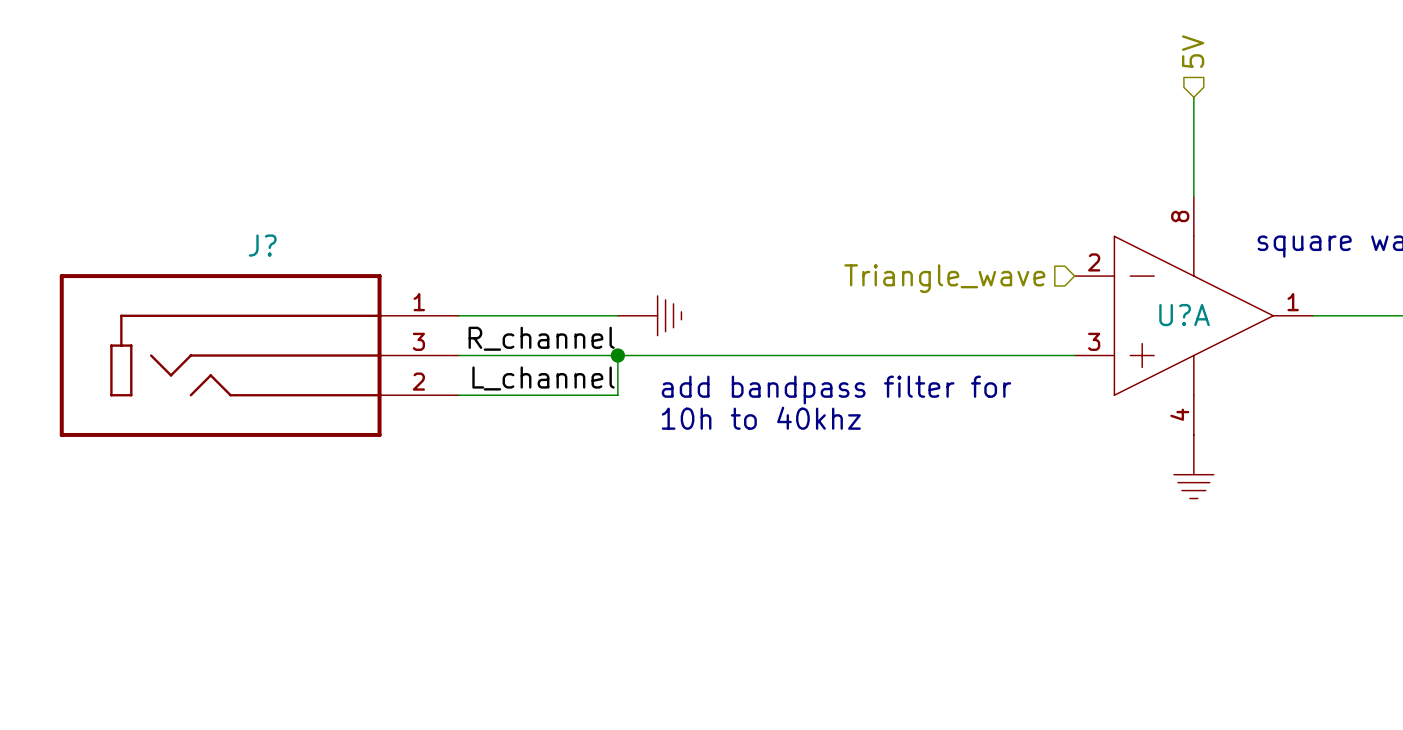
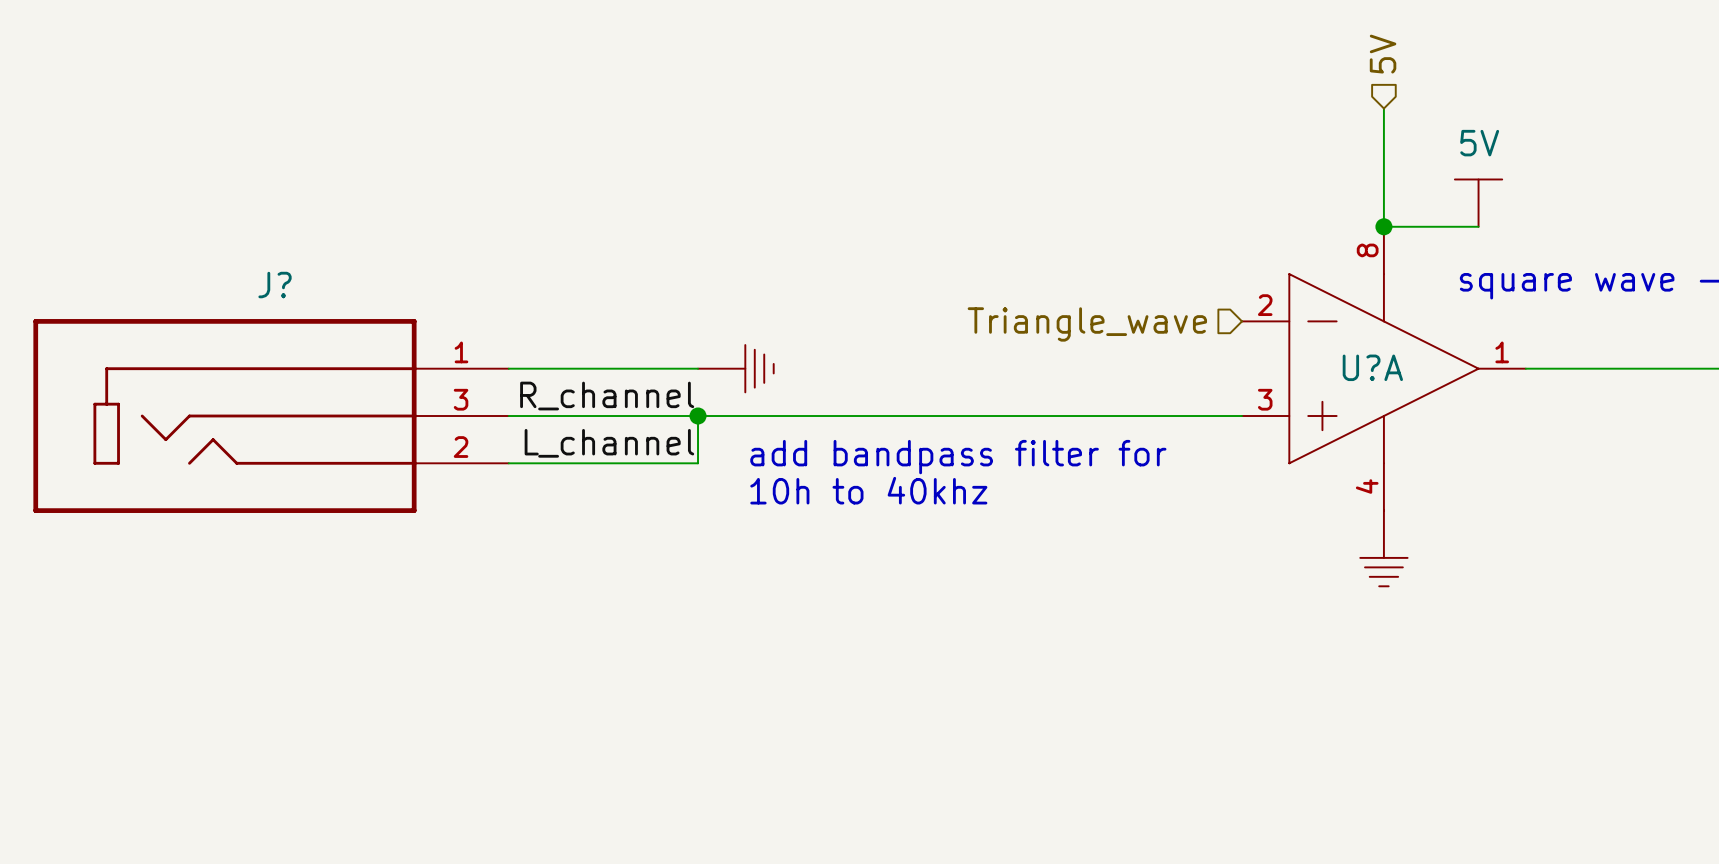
power symbol: none -> 5V (1478, 203)
wire: none -> (1383, 226) (1478, 226)
junction: none -> (1383, 226)

